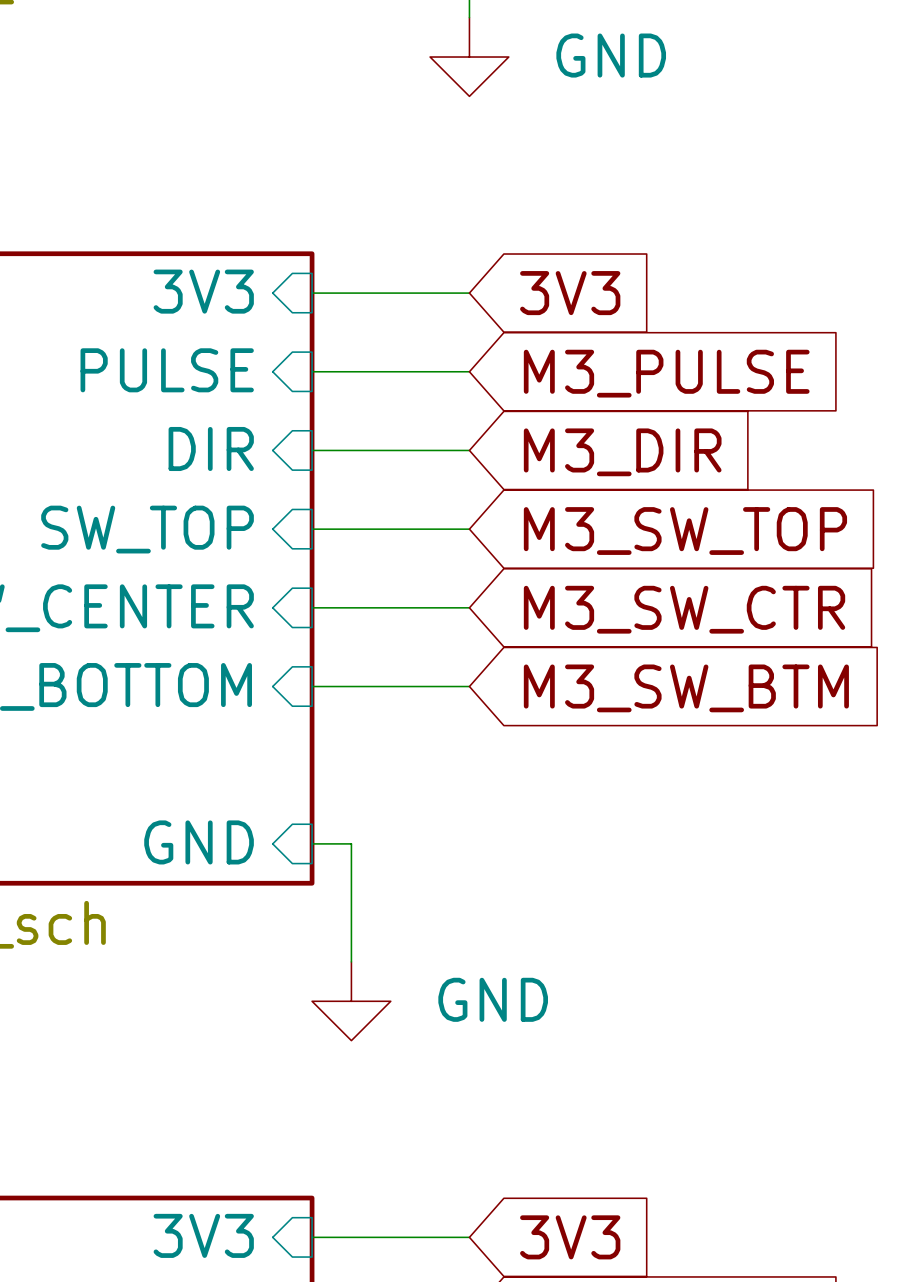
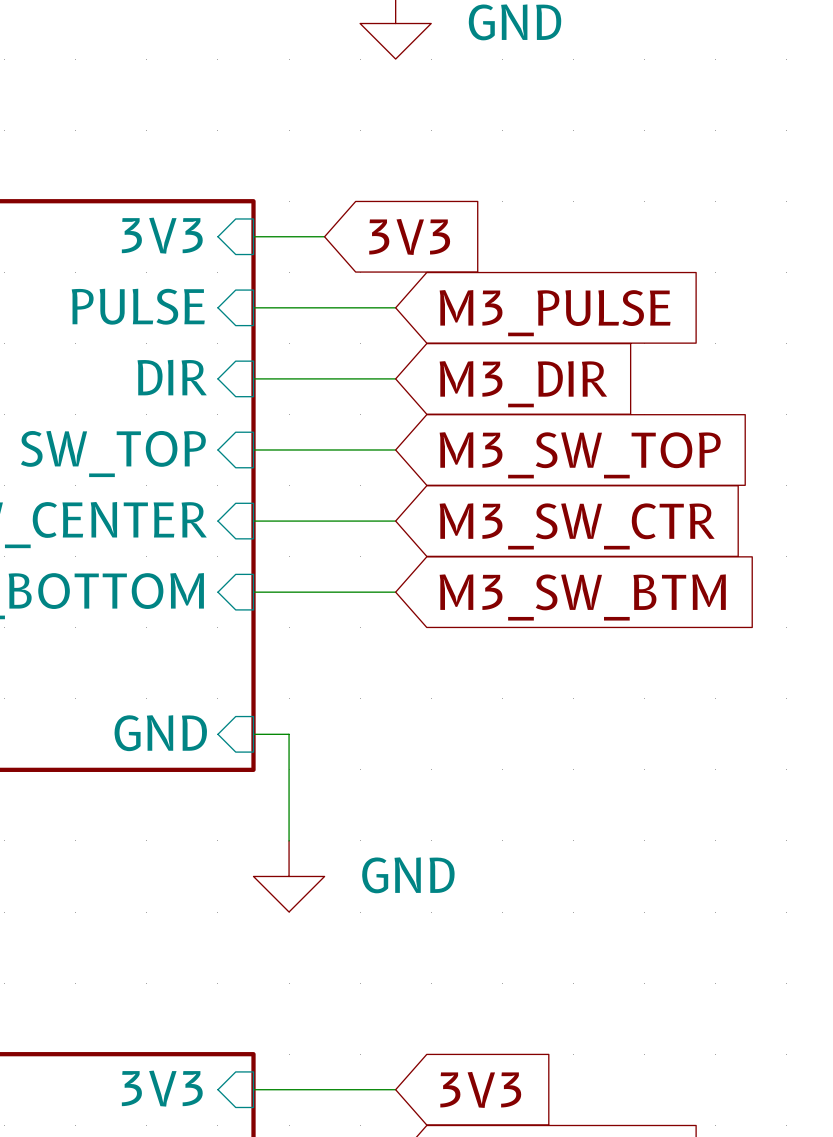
wire: (390, 293) (469, 293) -> none
global label position: 3V3 (570, 293) -> 3V3 (409, 236)

